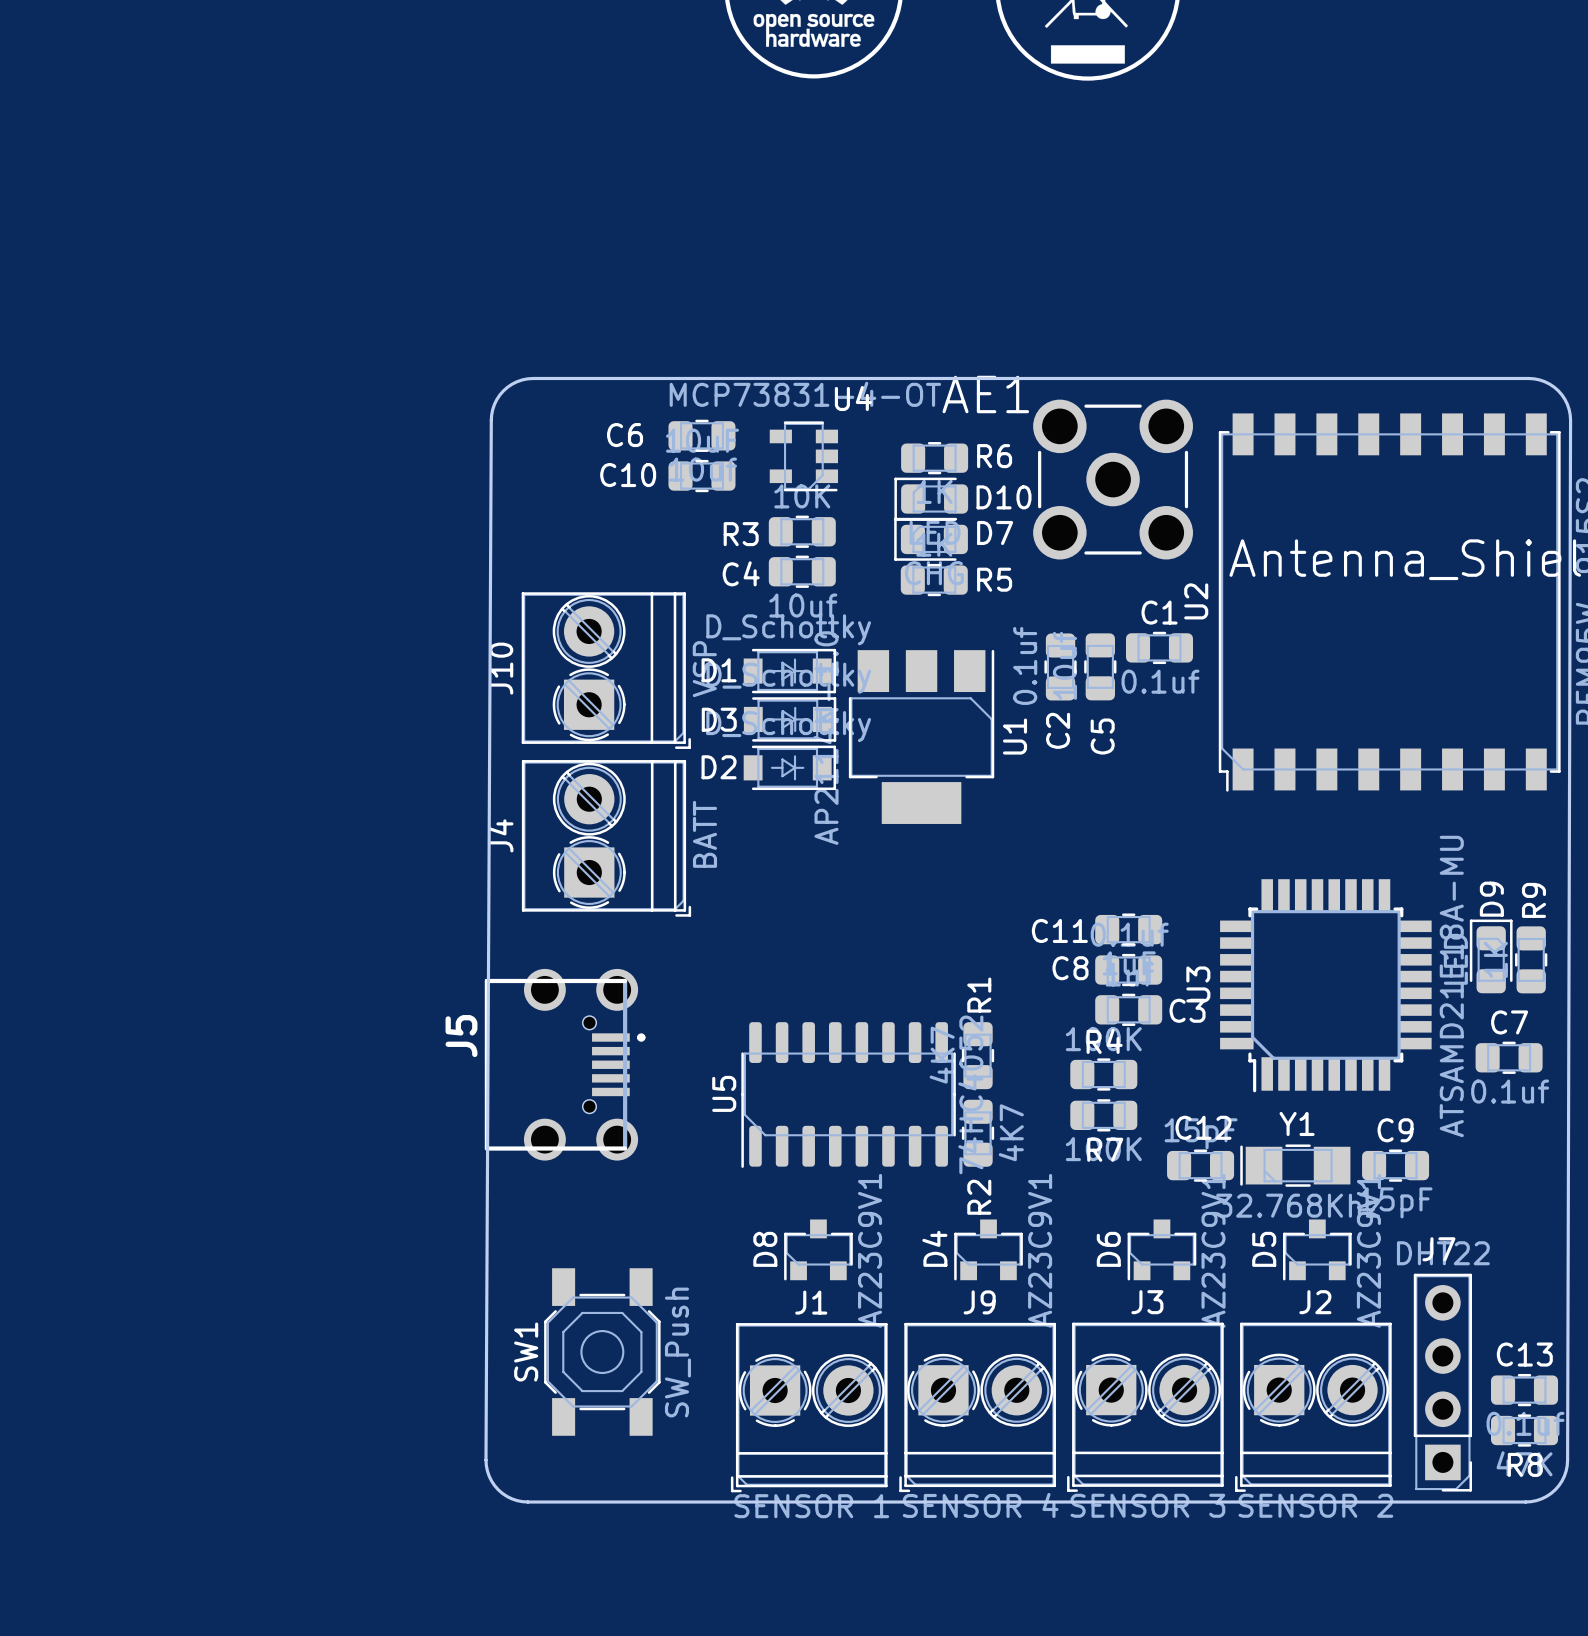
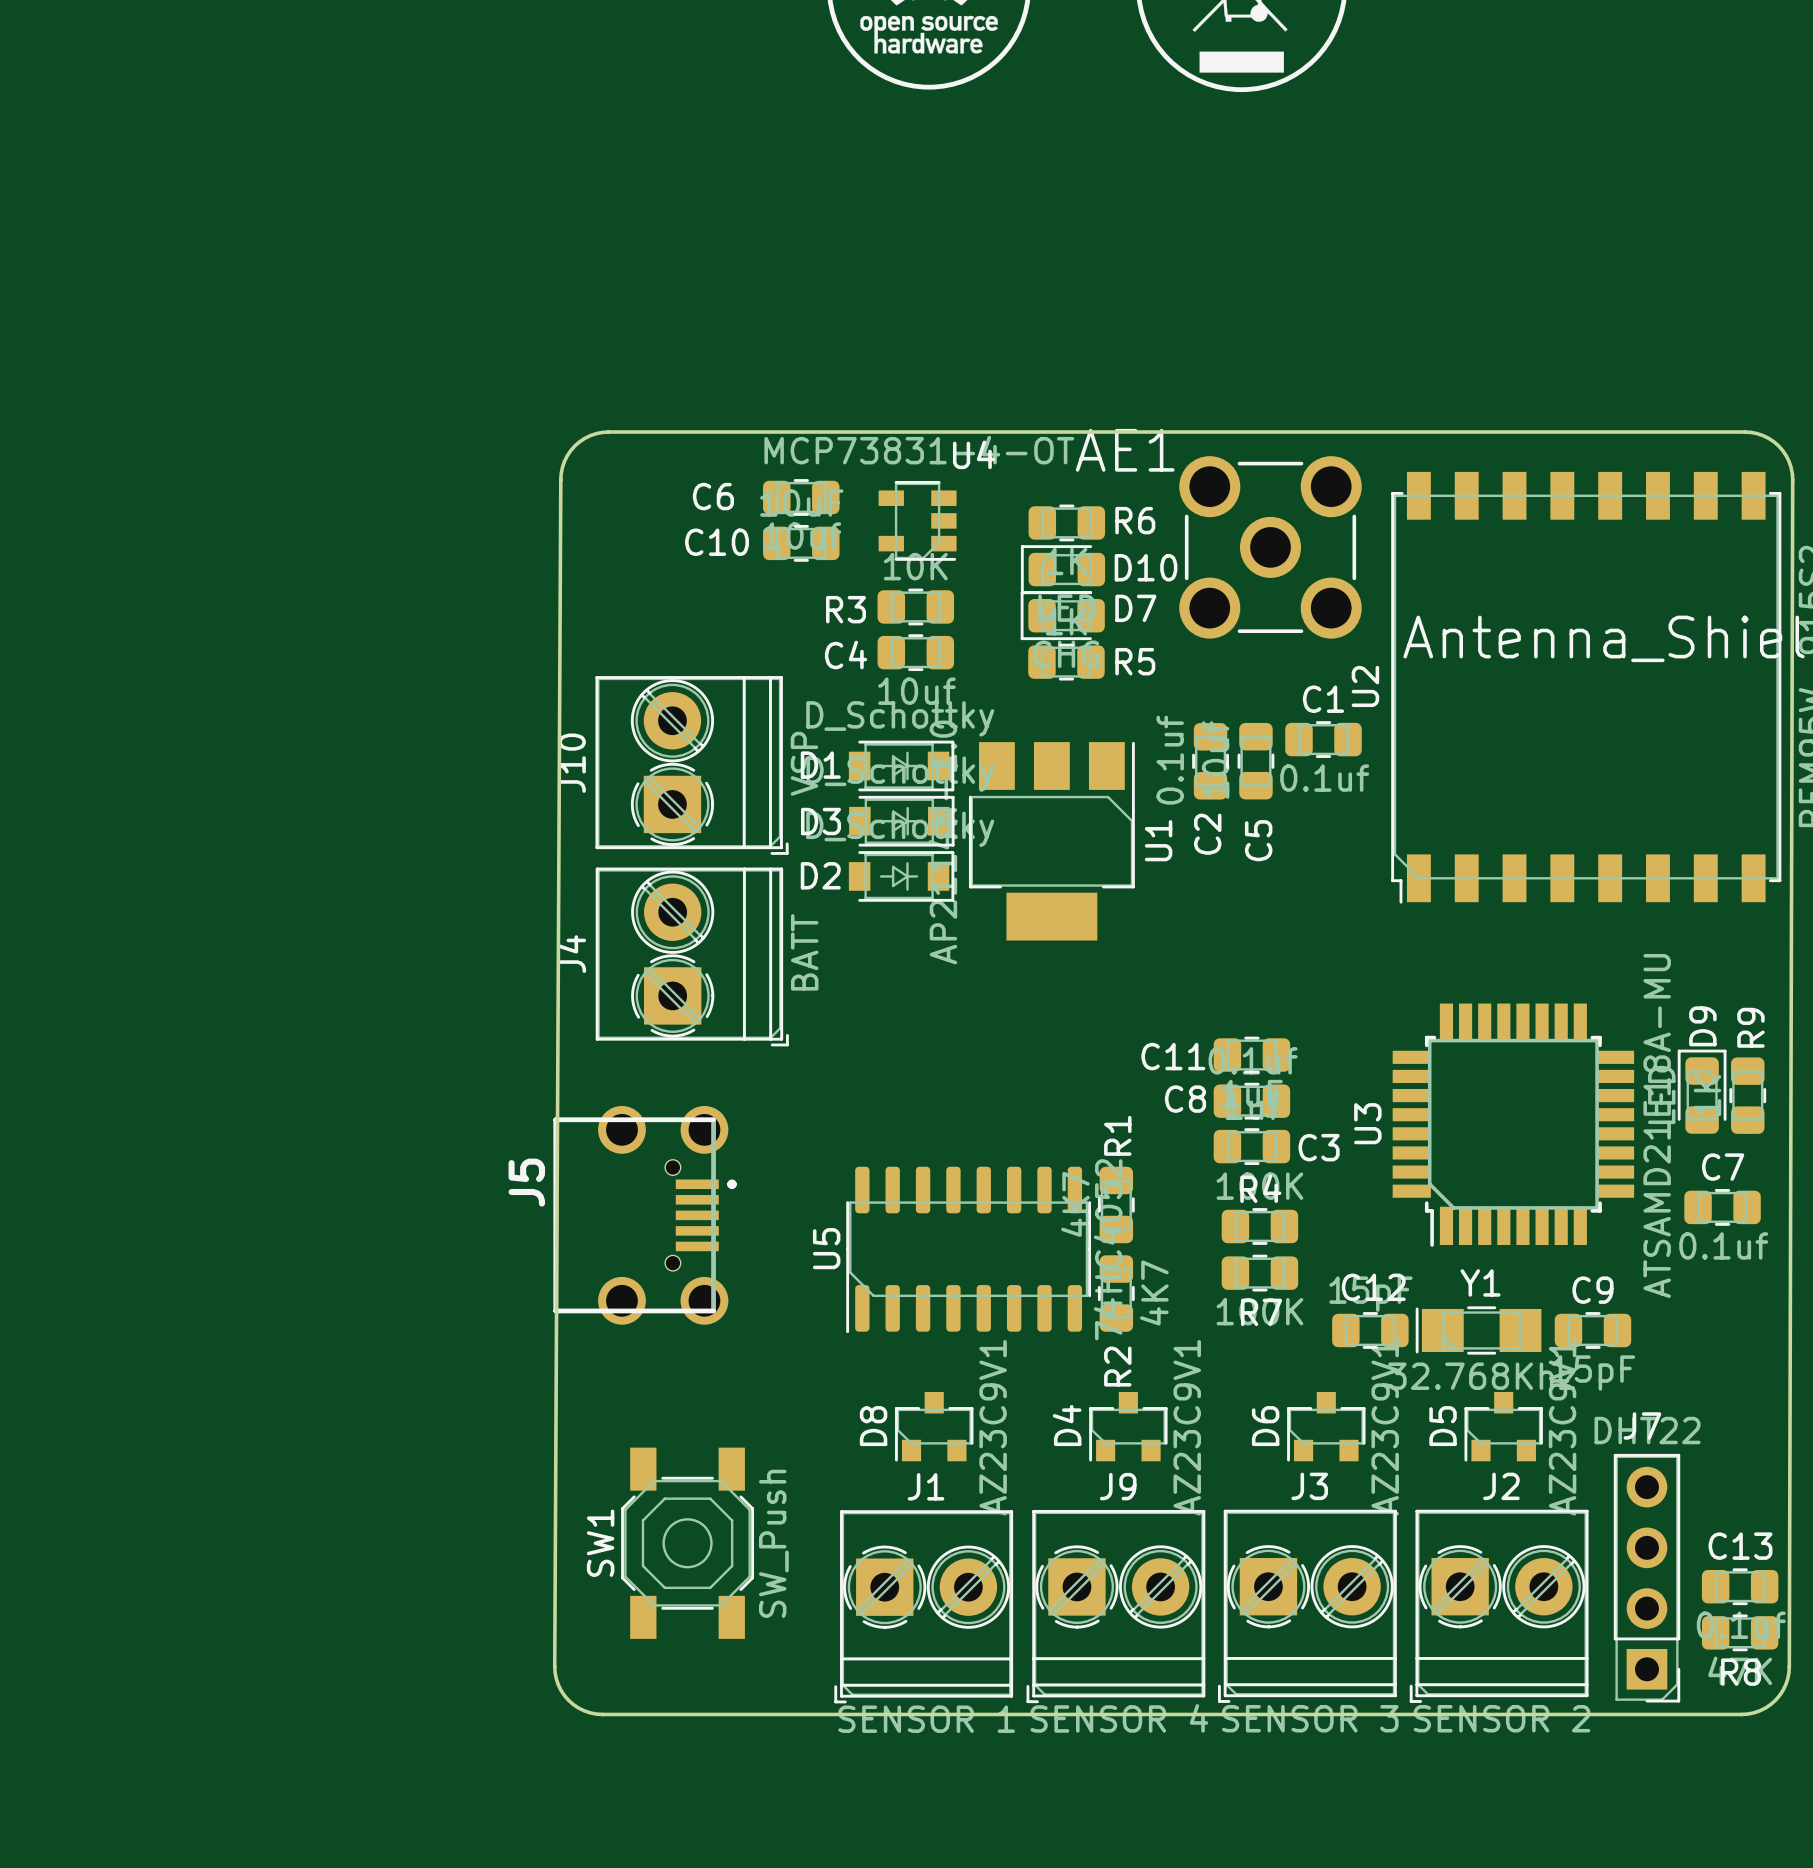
C11 position: (1128, 929) -> (1251, 1055)
C8 position: (1128, 970) -> (1251, 1101)
C3 position: (1128, 1009) -> (1251, 1146)

